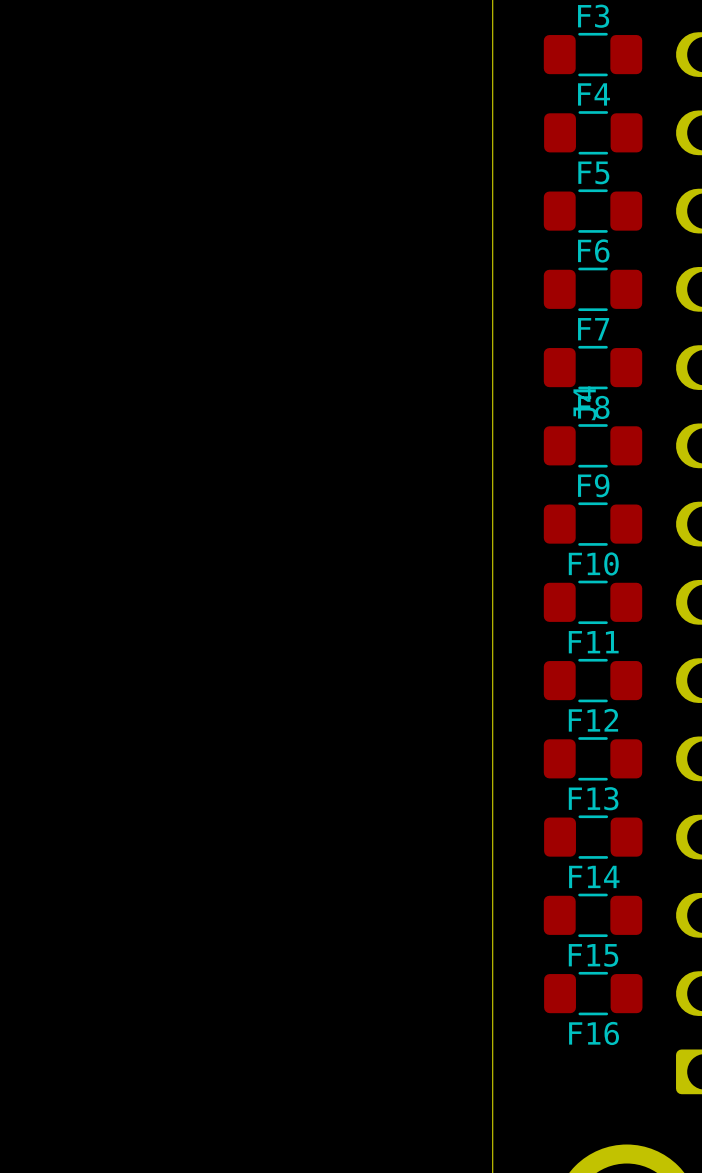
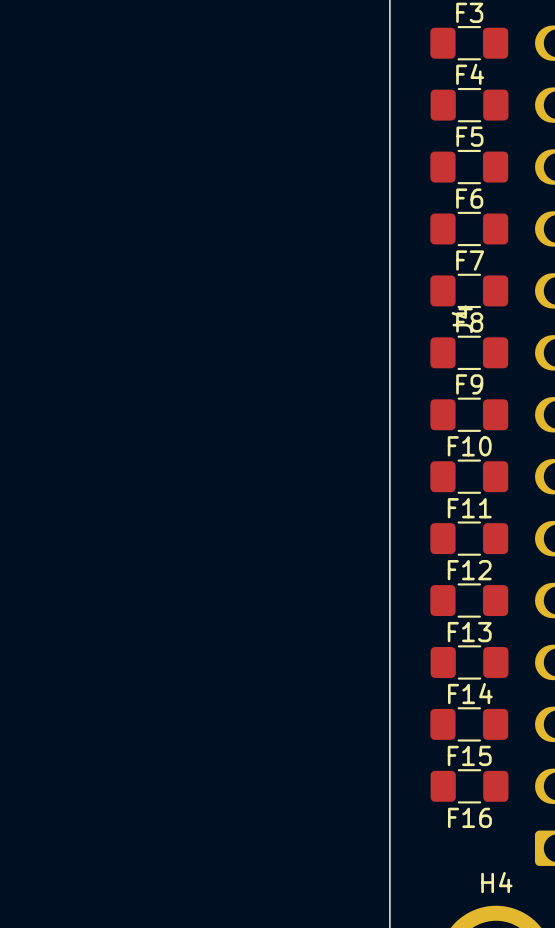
H4 name: none -> H4 (496, 882)

